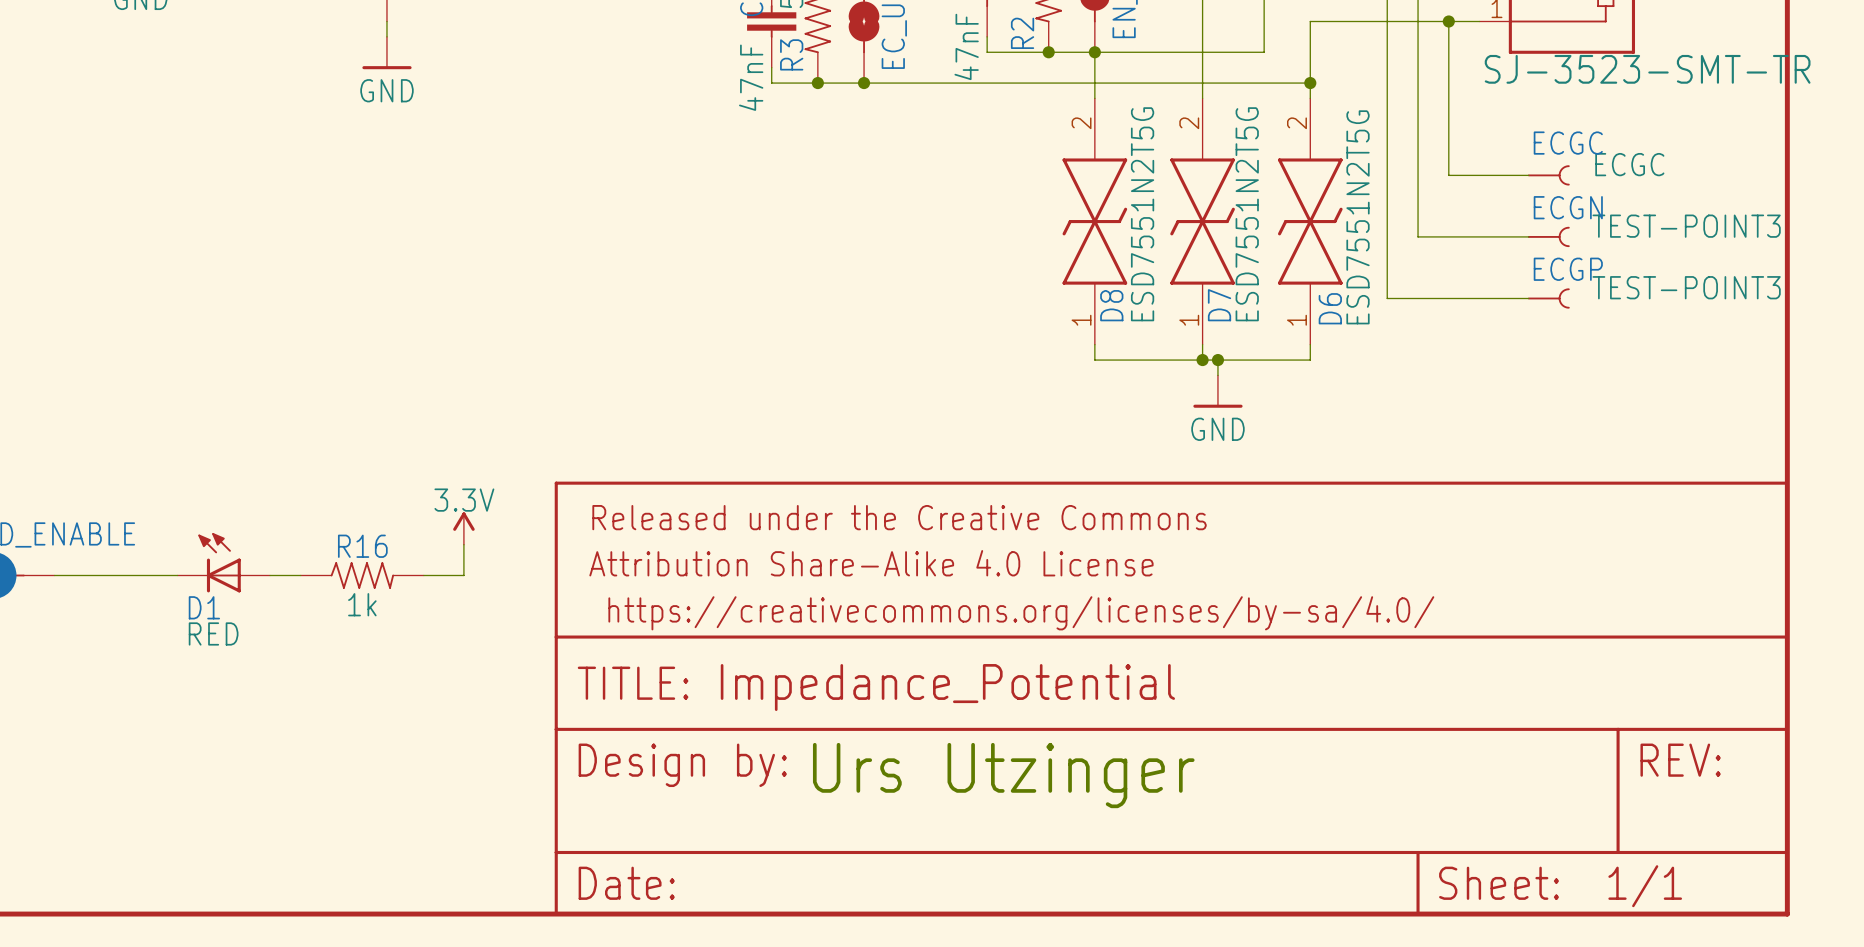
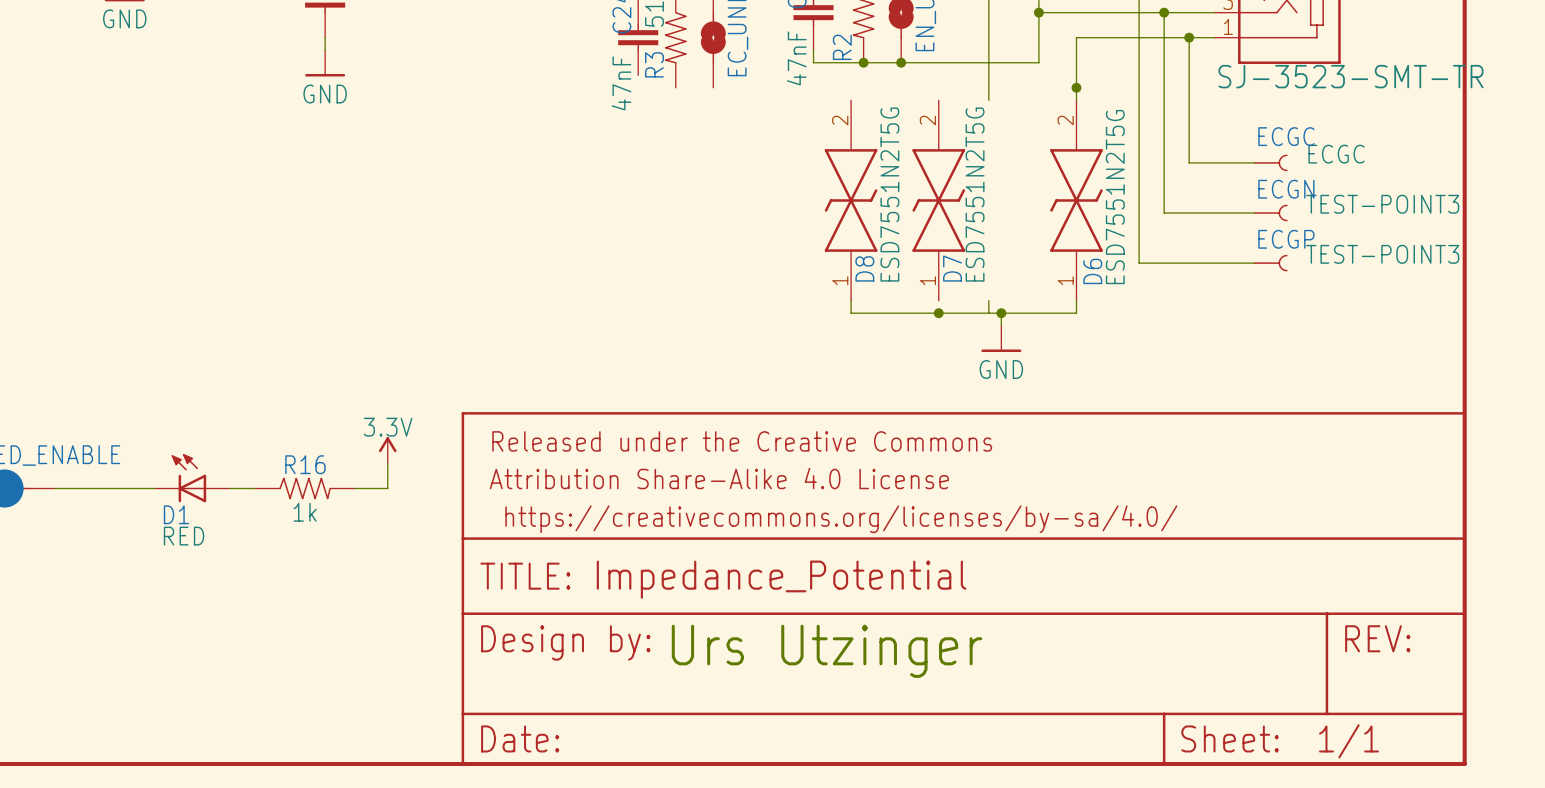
wire: (1094, 52) (1094, 98) -> none
wire: (771, 67) (771, 83) (1310, 83) -> none
junction: (817, 83) -> none
junction: (864, 83) -> none
D8 position: (1094, 221) -> (851, 200)
D7 position: (1202, 221) -> (938, 200)
wire: (1094, 344) (1094, 360) -> (851, 300) (851, 313) (901, 313)
junction position: (1202, 360) -> (938, 313)

